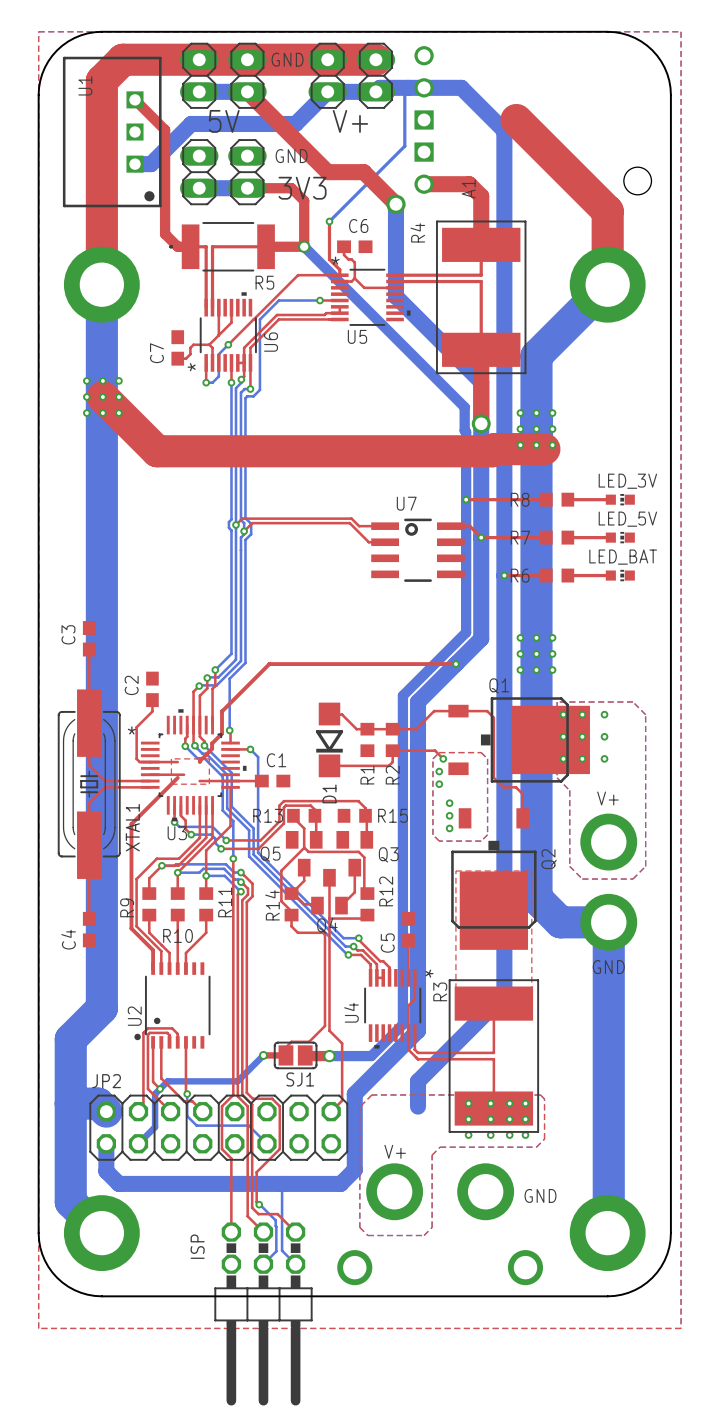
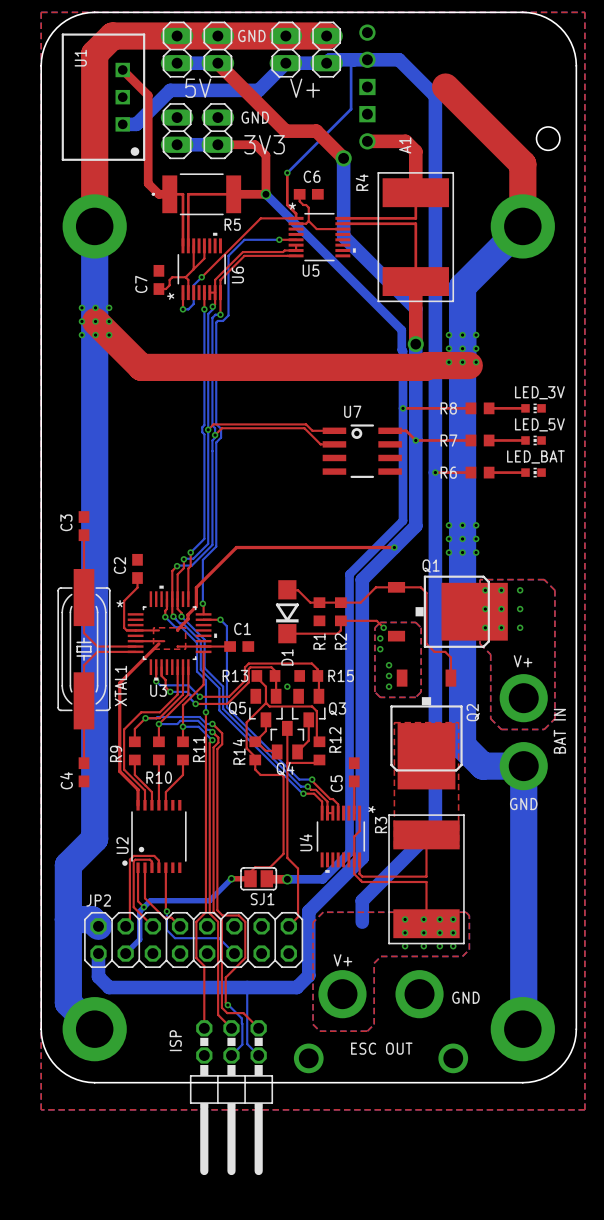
via: none -> (287, 686)
Q4 footprint: [285, 830, 323, 877] -> [249, 688, 283, 728]
Q3 footprint: [336, 830, 374, 877] -> [292, 688, 326, 728]
Q5 footprint: [311, 868, 348, 915] -> [270, 720, 305, 760]
text: none -> BAT IN (559, 731)
text: none -> ESC OUT (381, 1048)

